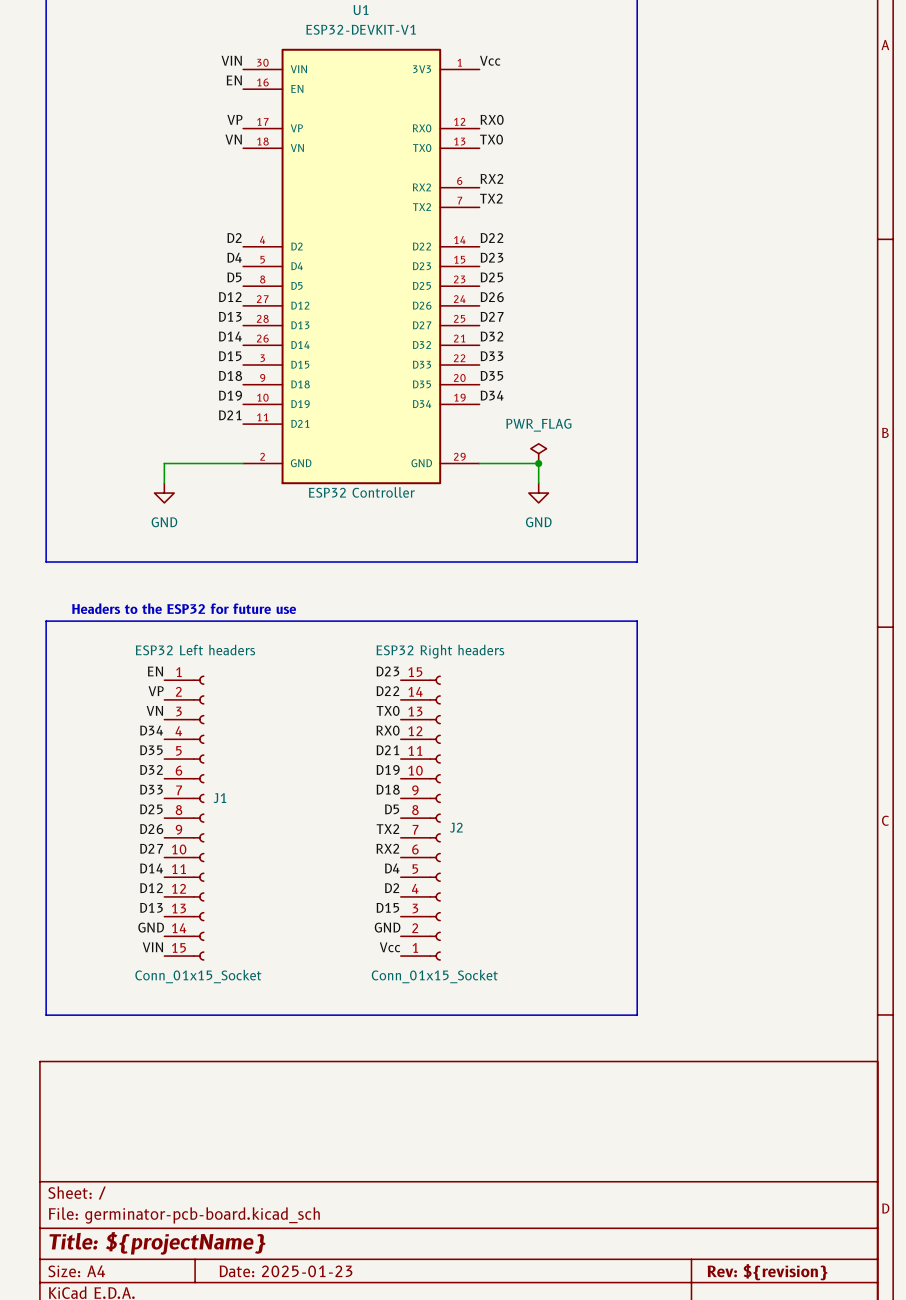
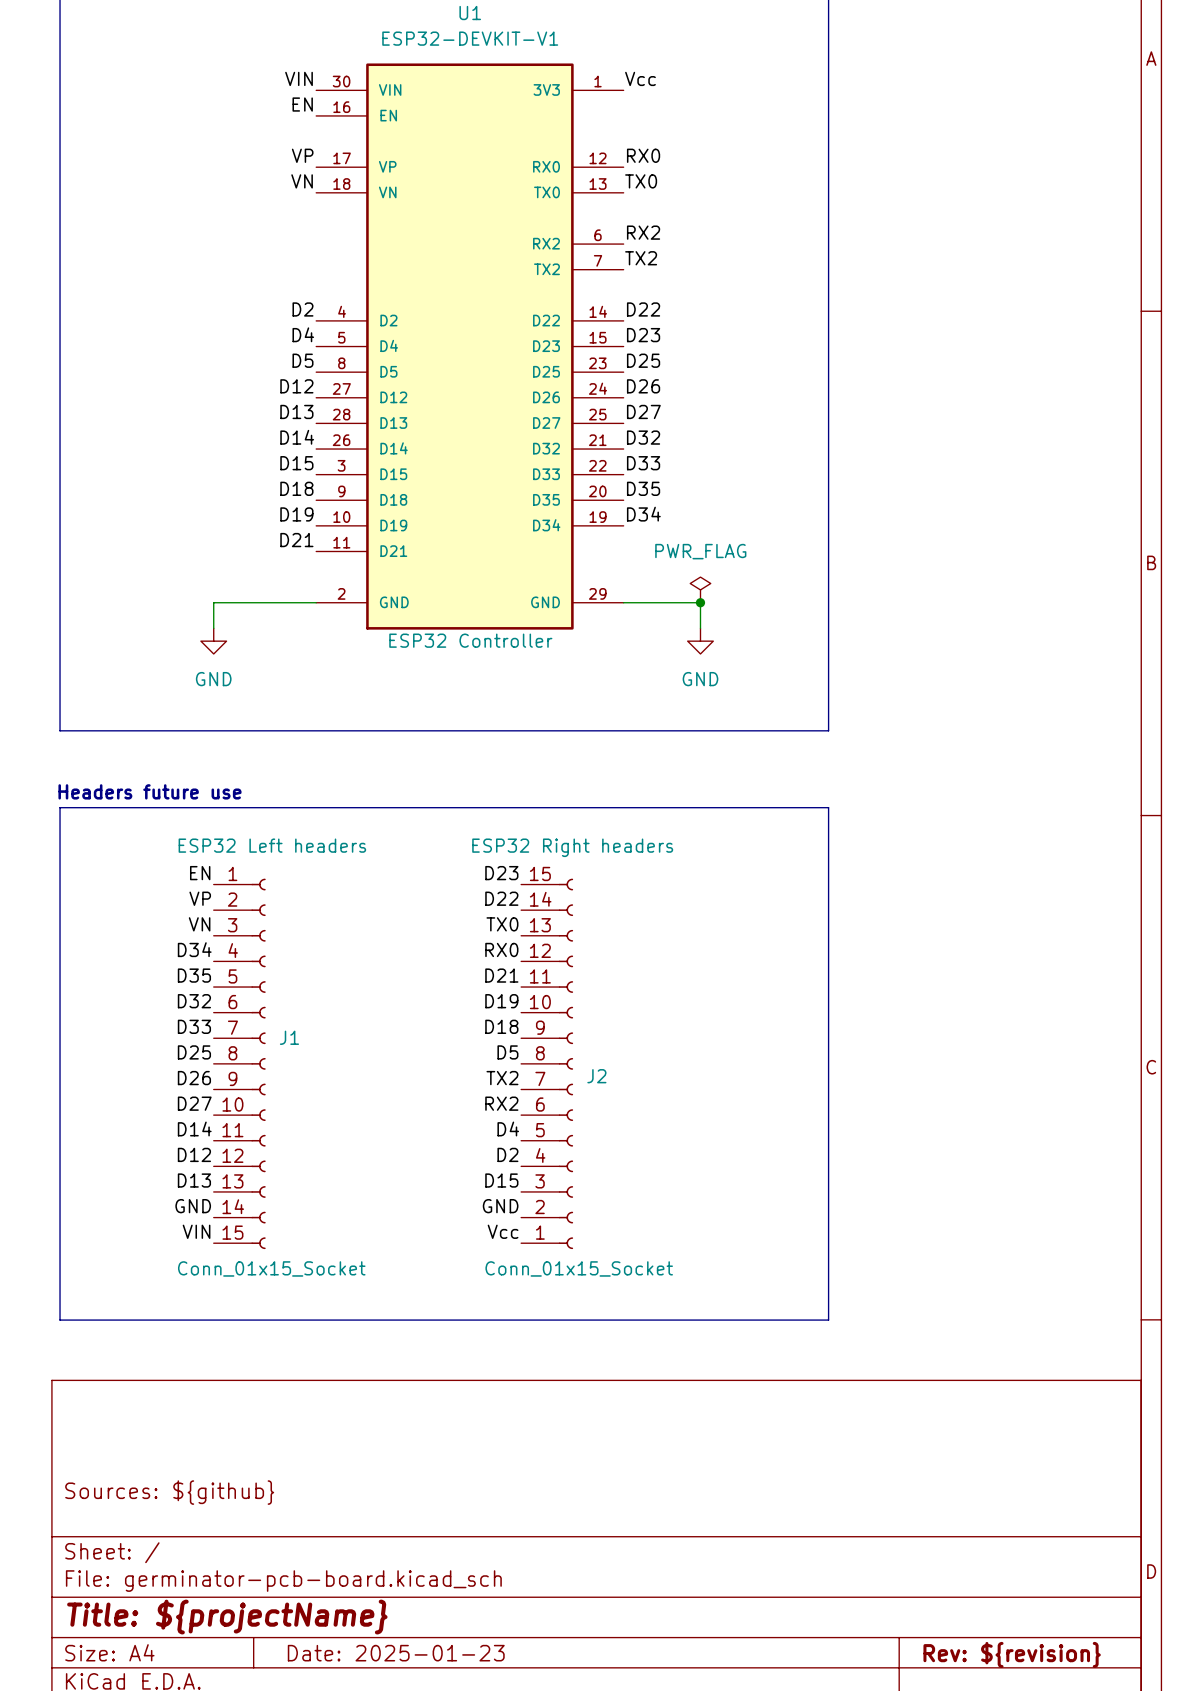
text: Headers to the ESP32 for future use (184, 608) -> Headers future use (149, 791)
title block: none -> Sources: ${github} (169, 1492)

